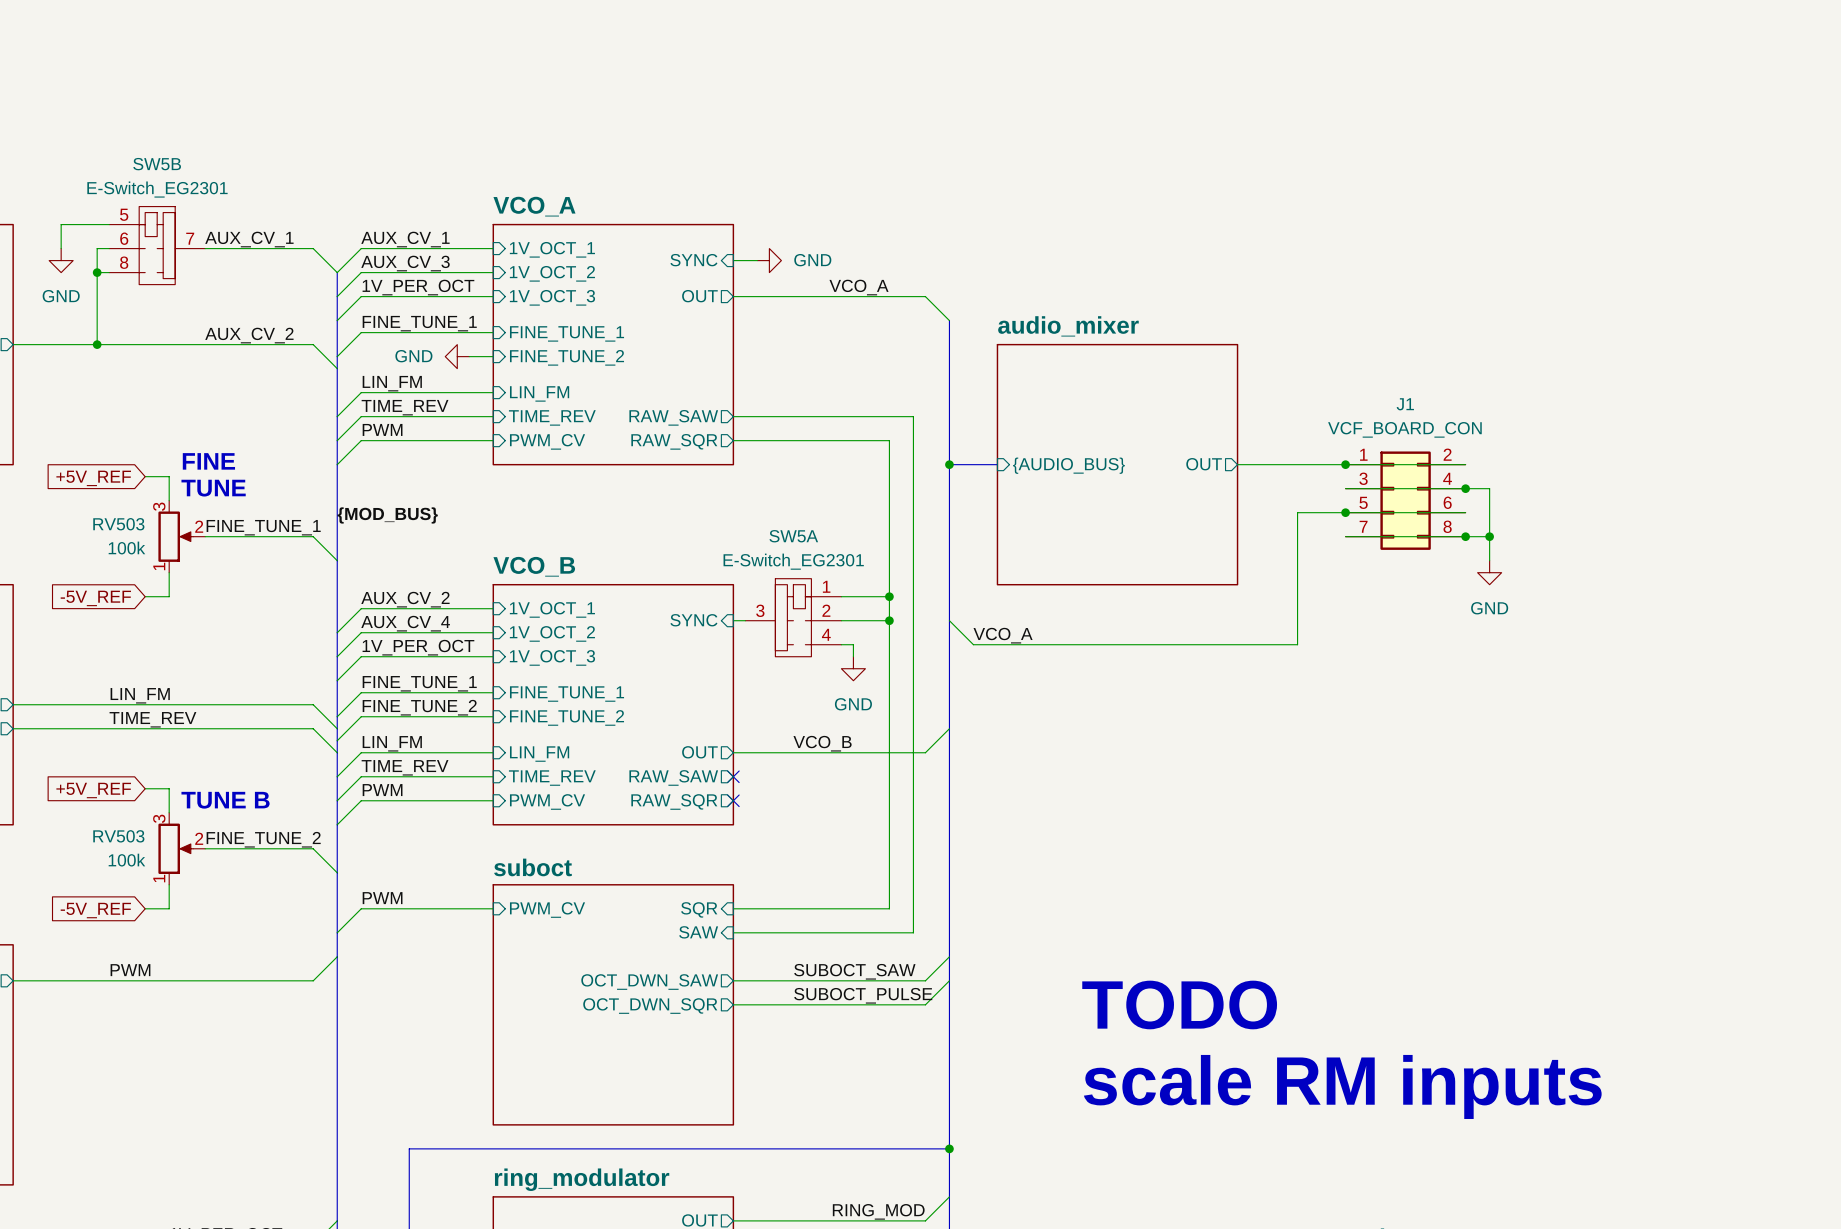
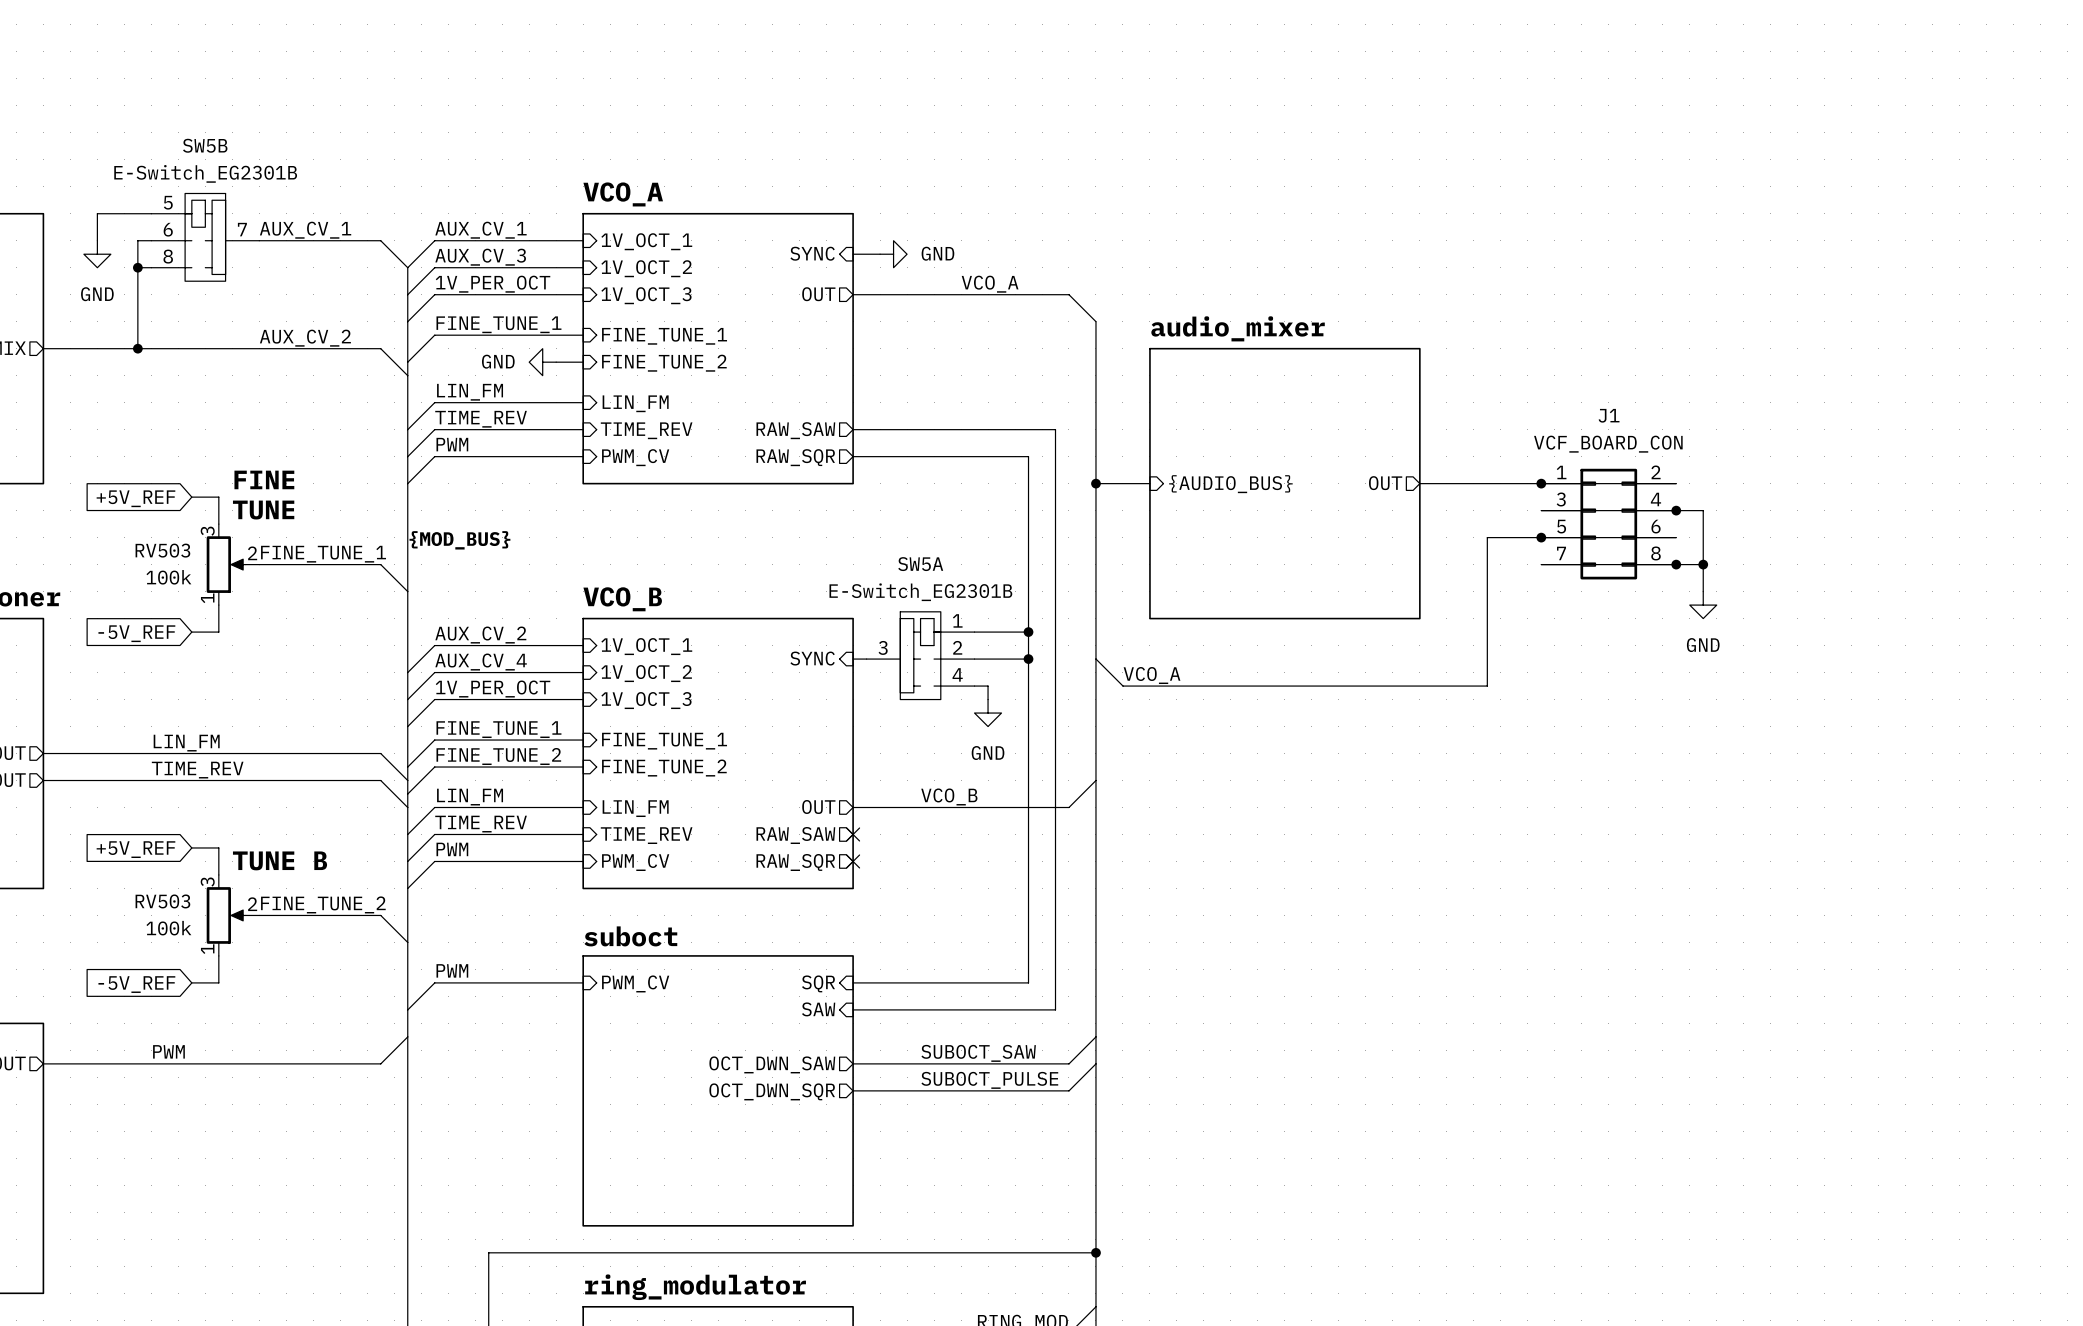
SW5B value: E-Switch_EG2301 (157, 189) -> E-Switch_EG2301B (205, 173)
SW5A value: E-Switch_EG2301 (793, 561) -> E-Switch_EG2301B (920, 592)
text: TODO (1179, 1004) -> none
text: scale RM inputs (1342, 1086) -> none

